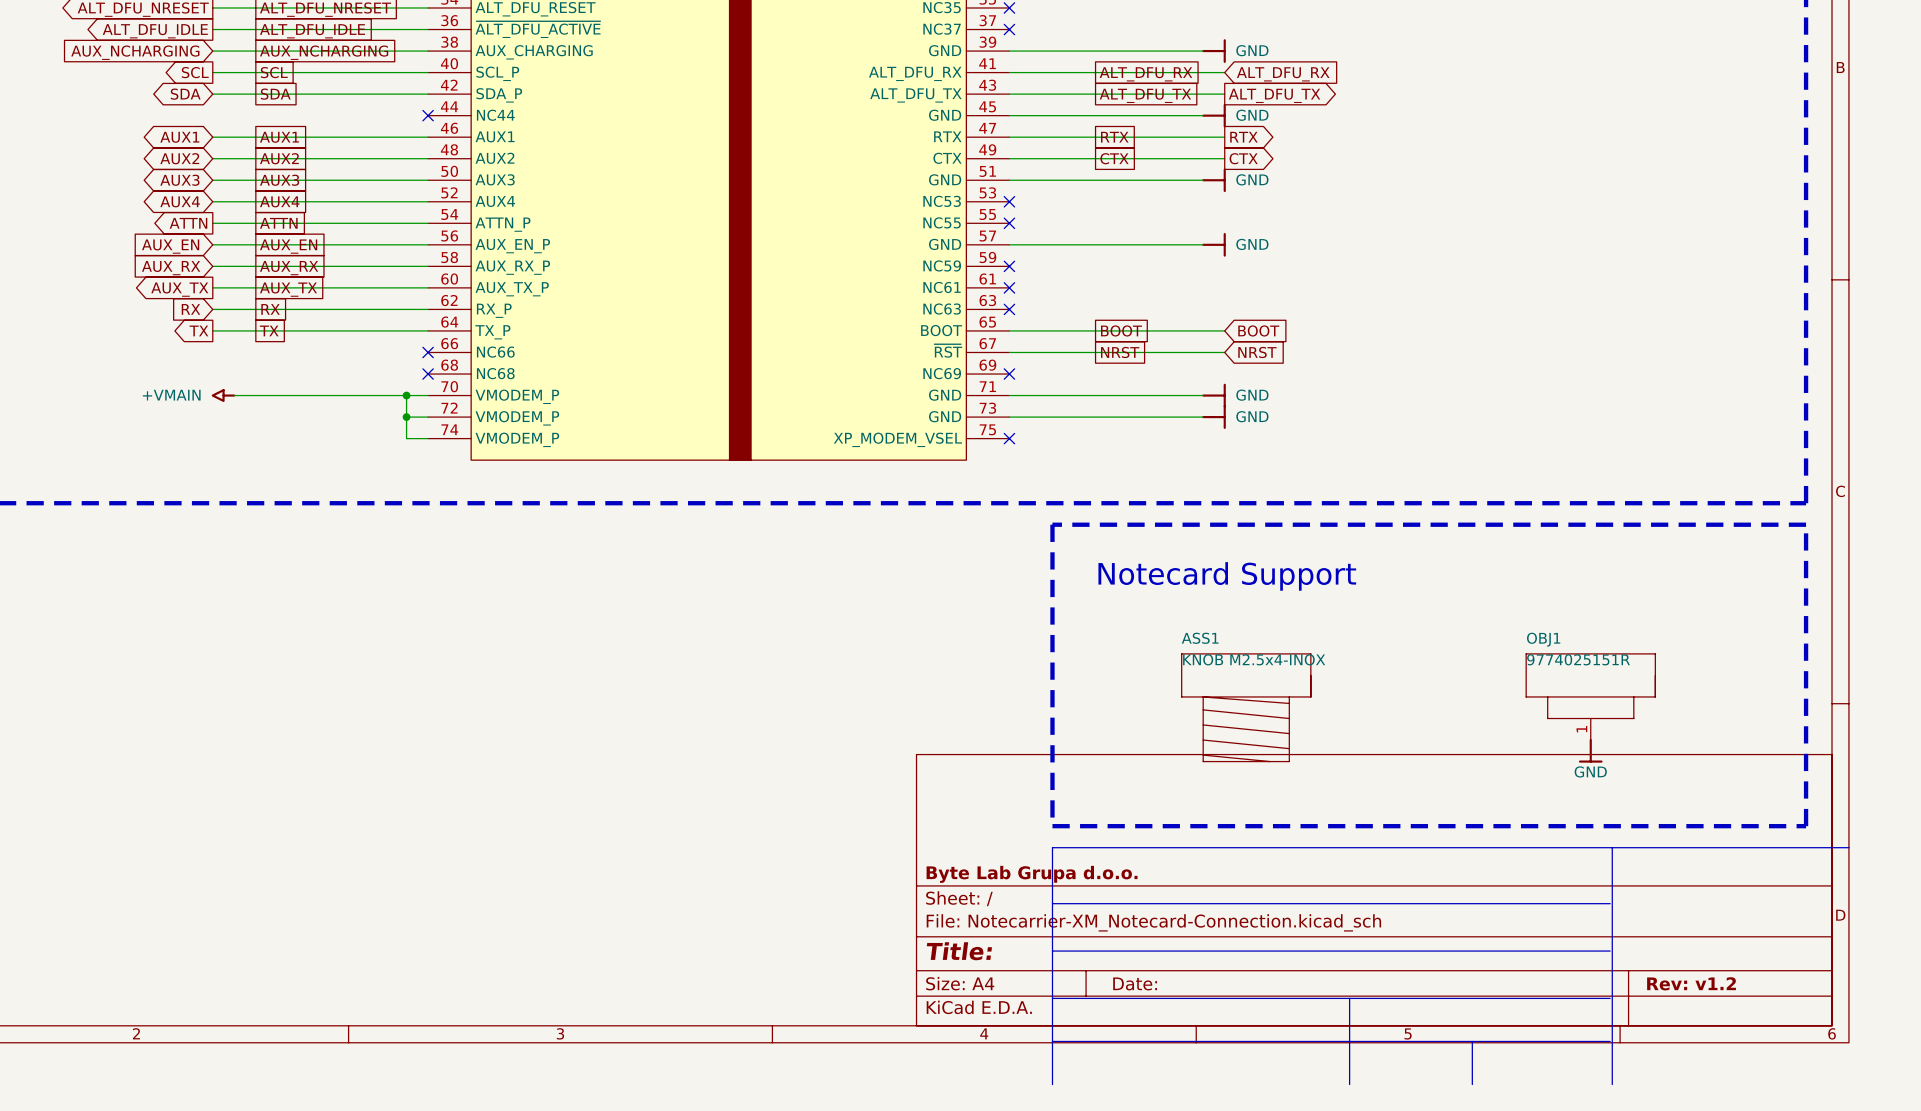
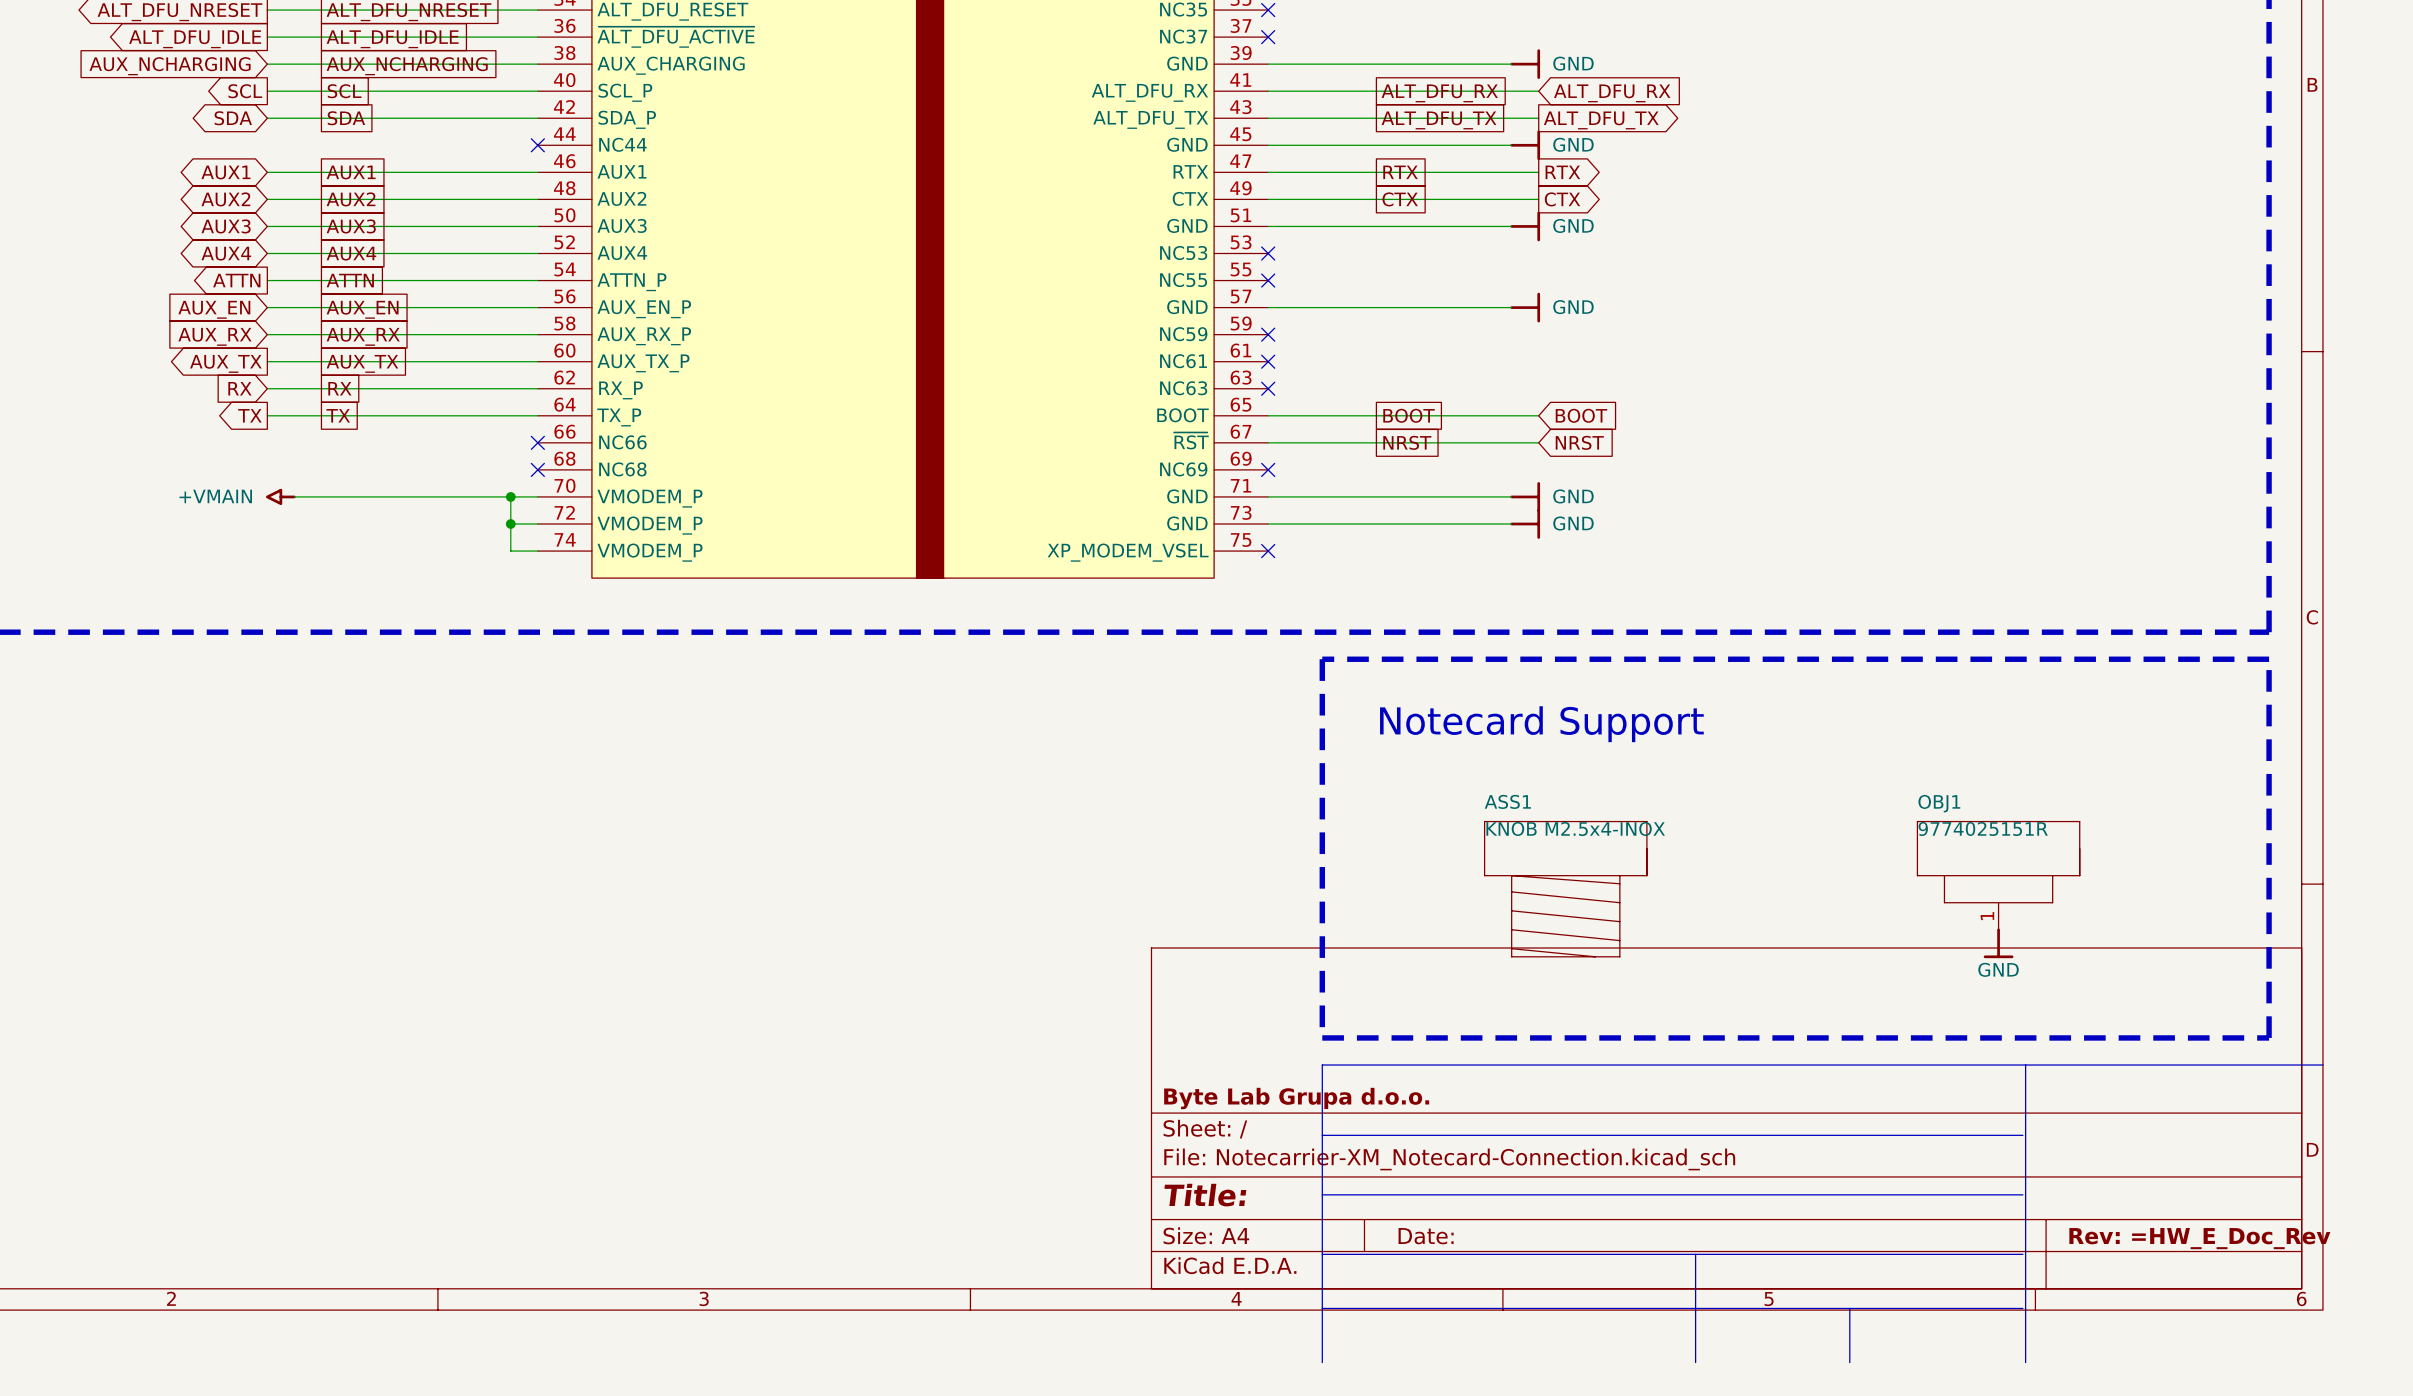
title block: Rev: v1.2 (1691, 983) -> Rev: =HW_E_Doc_Rev (2199, 1238)

